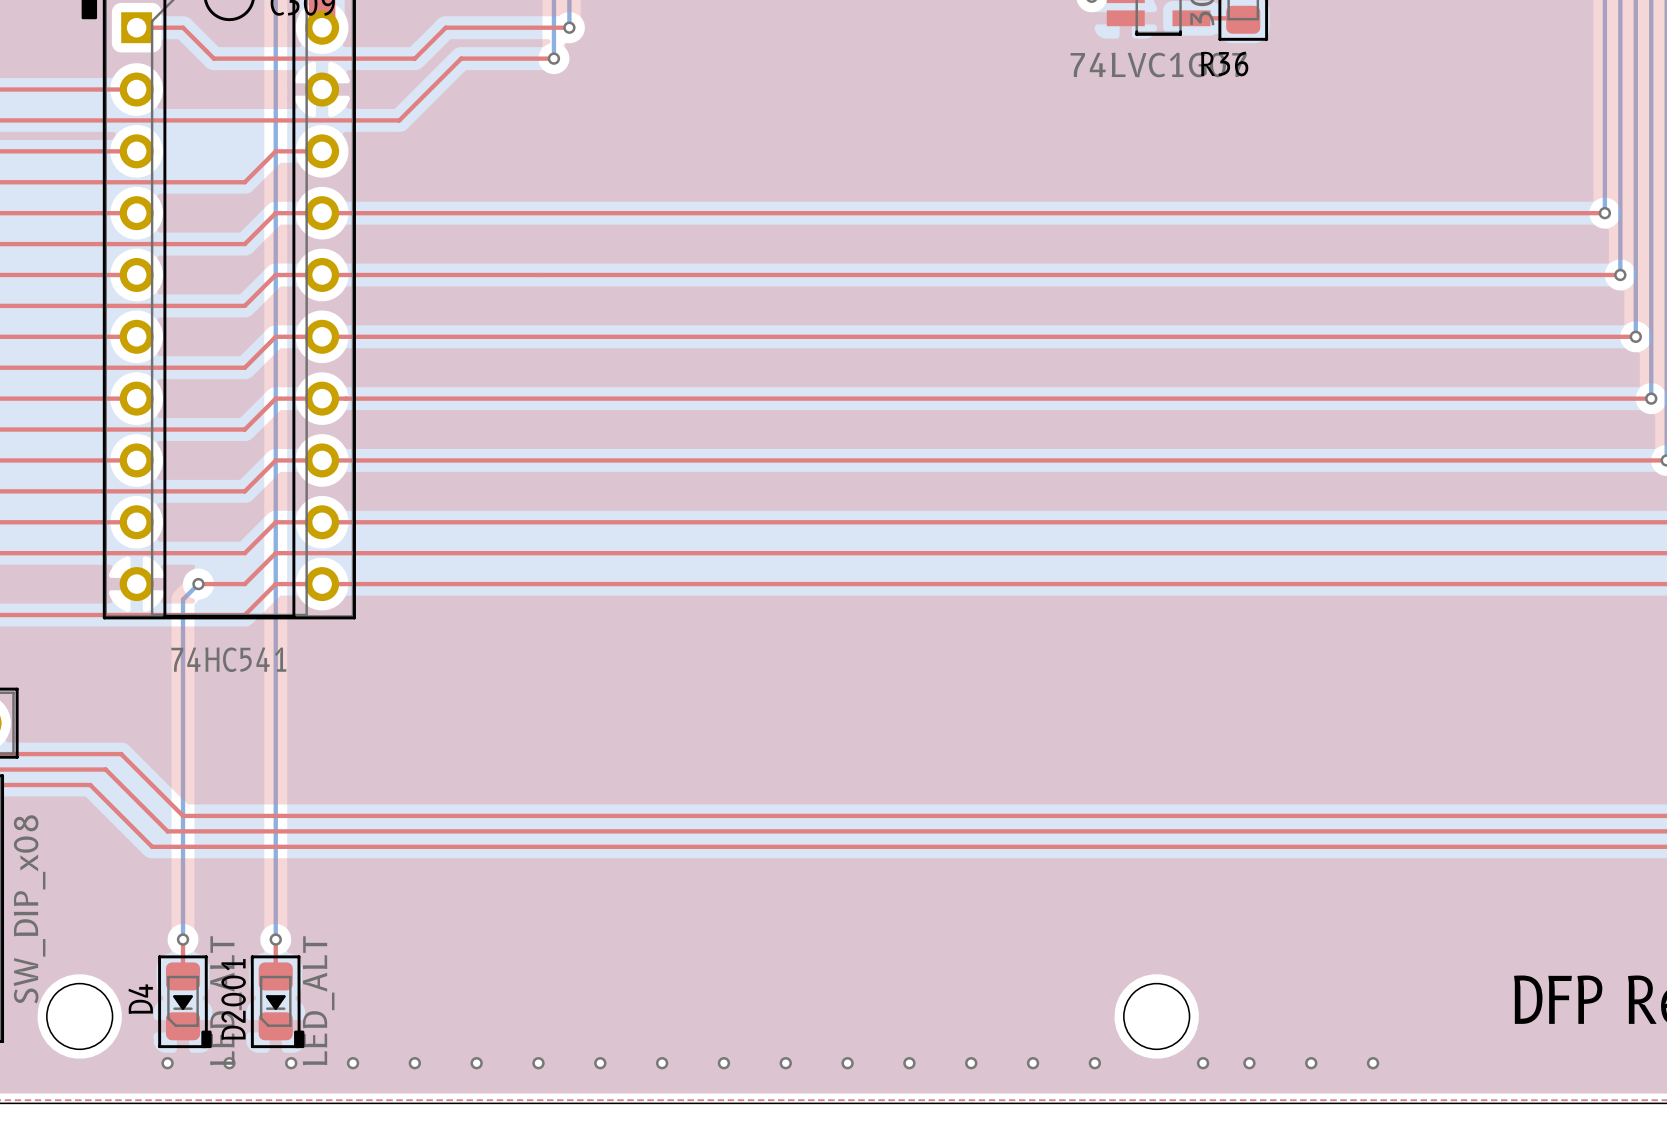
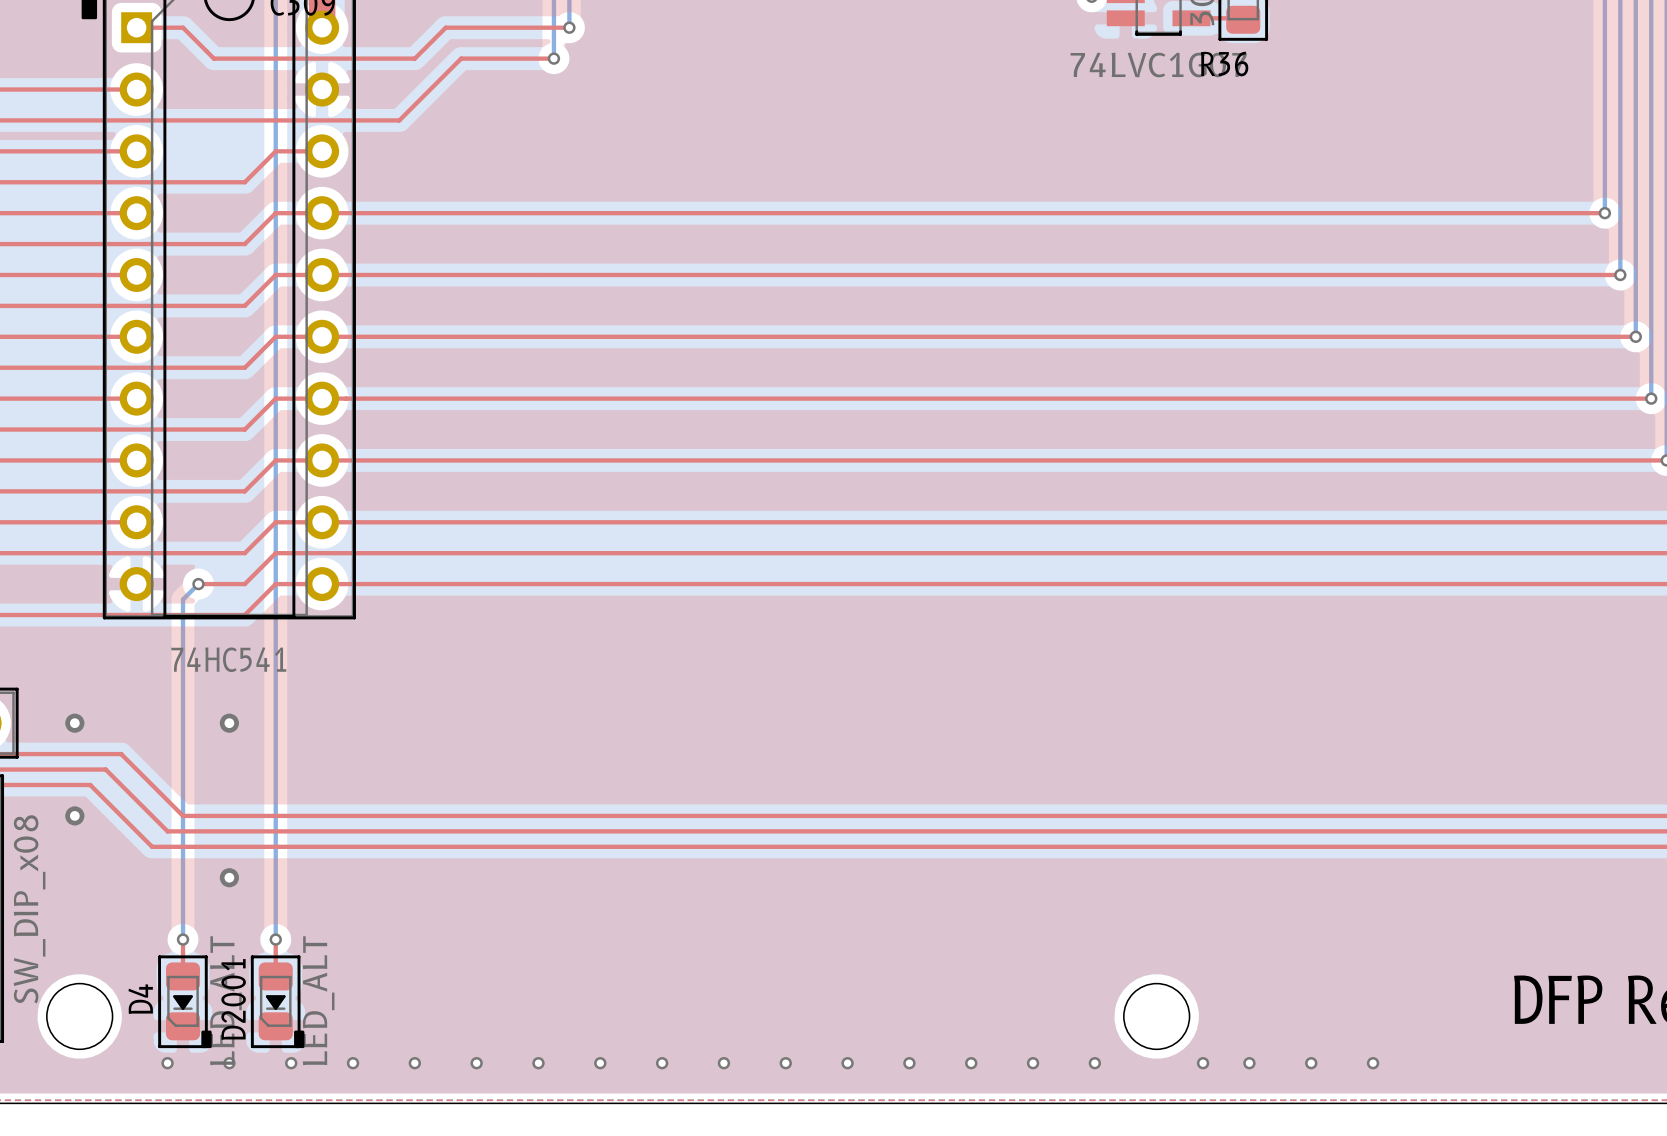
via: none -> (74, 723)
via: none -> (229, 723)
via: none -> (74, 815)
via: none -> (229, 877)

